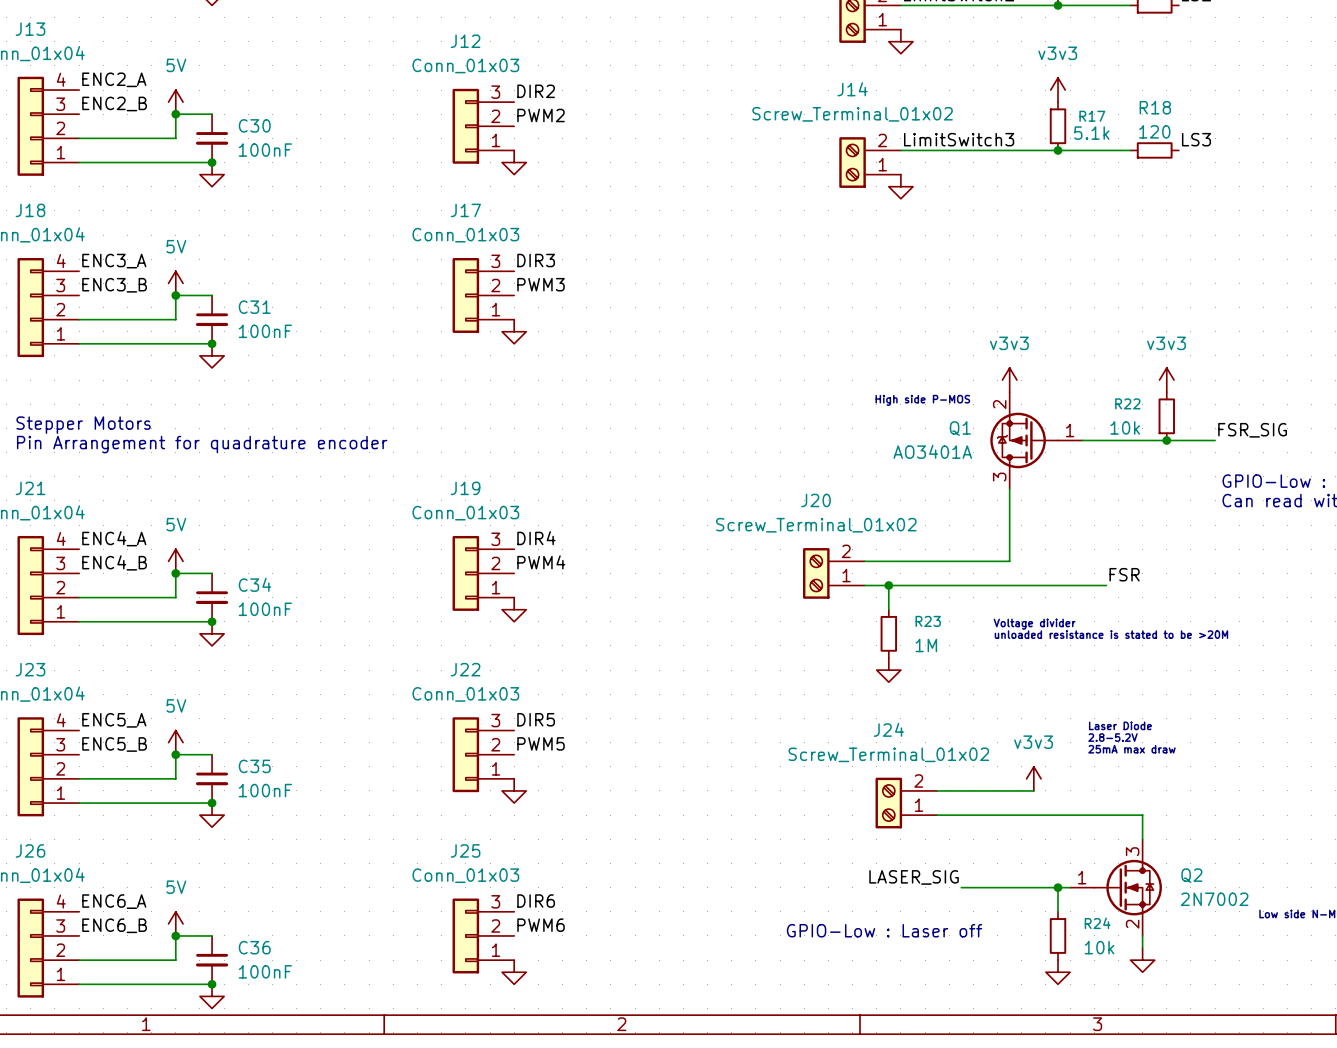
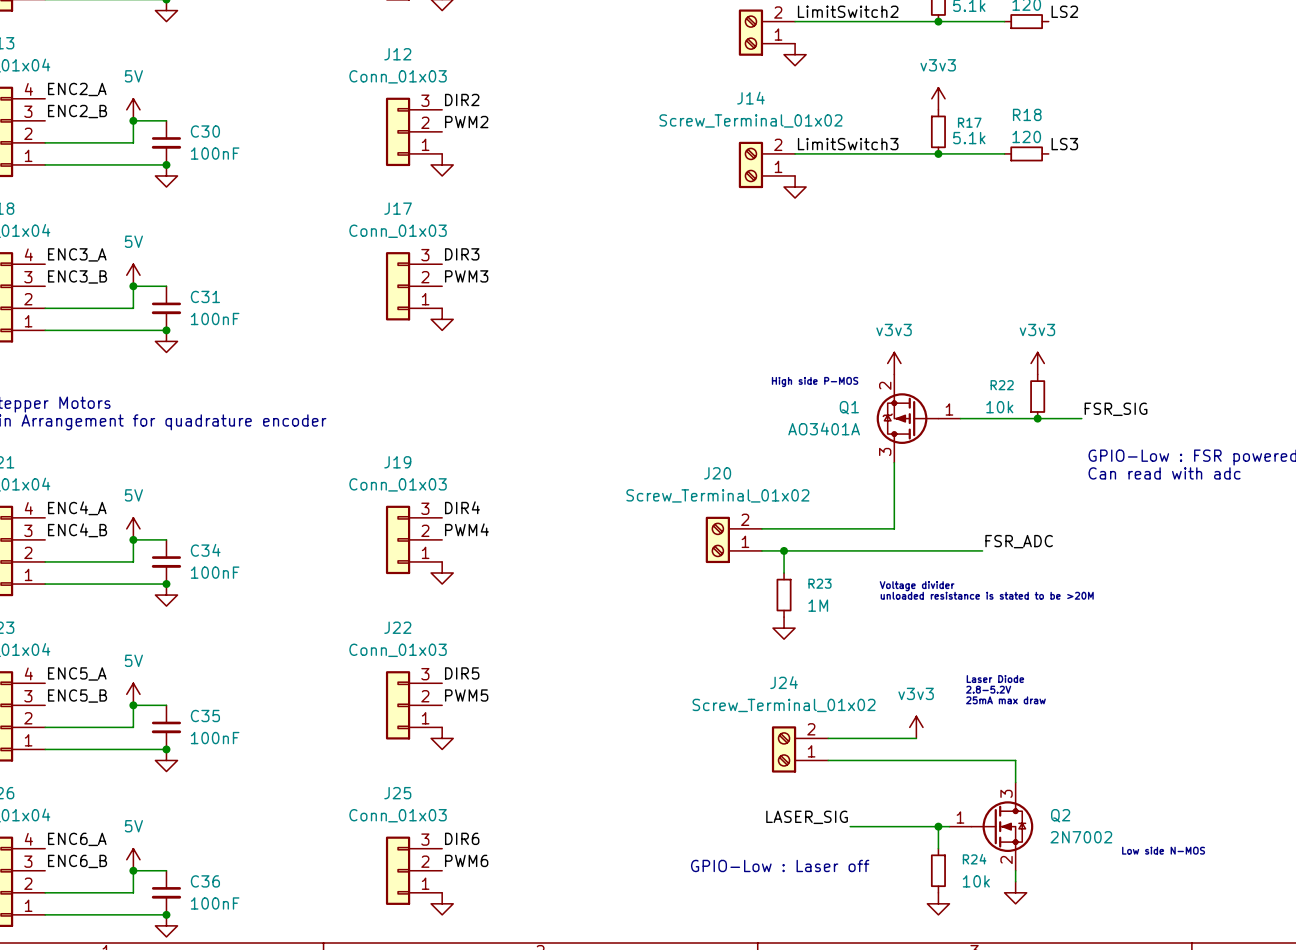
label: FSR (1124, 574) -> FSR_ADC (1019, 541)

